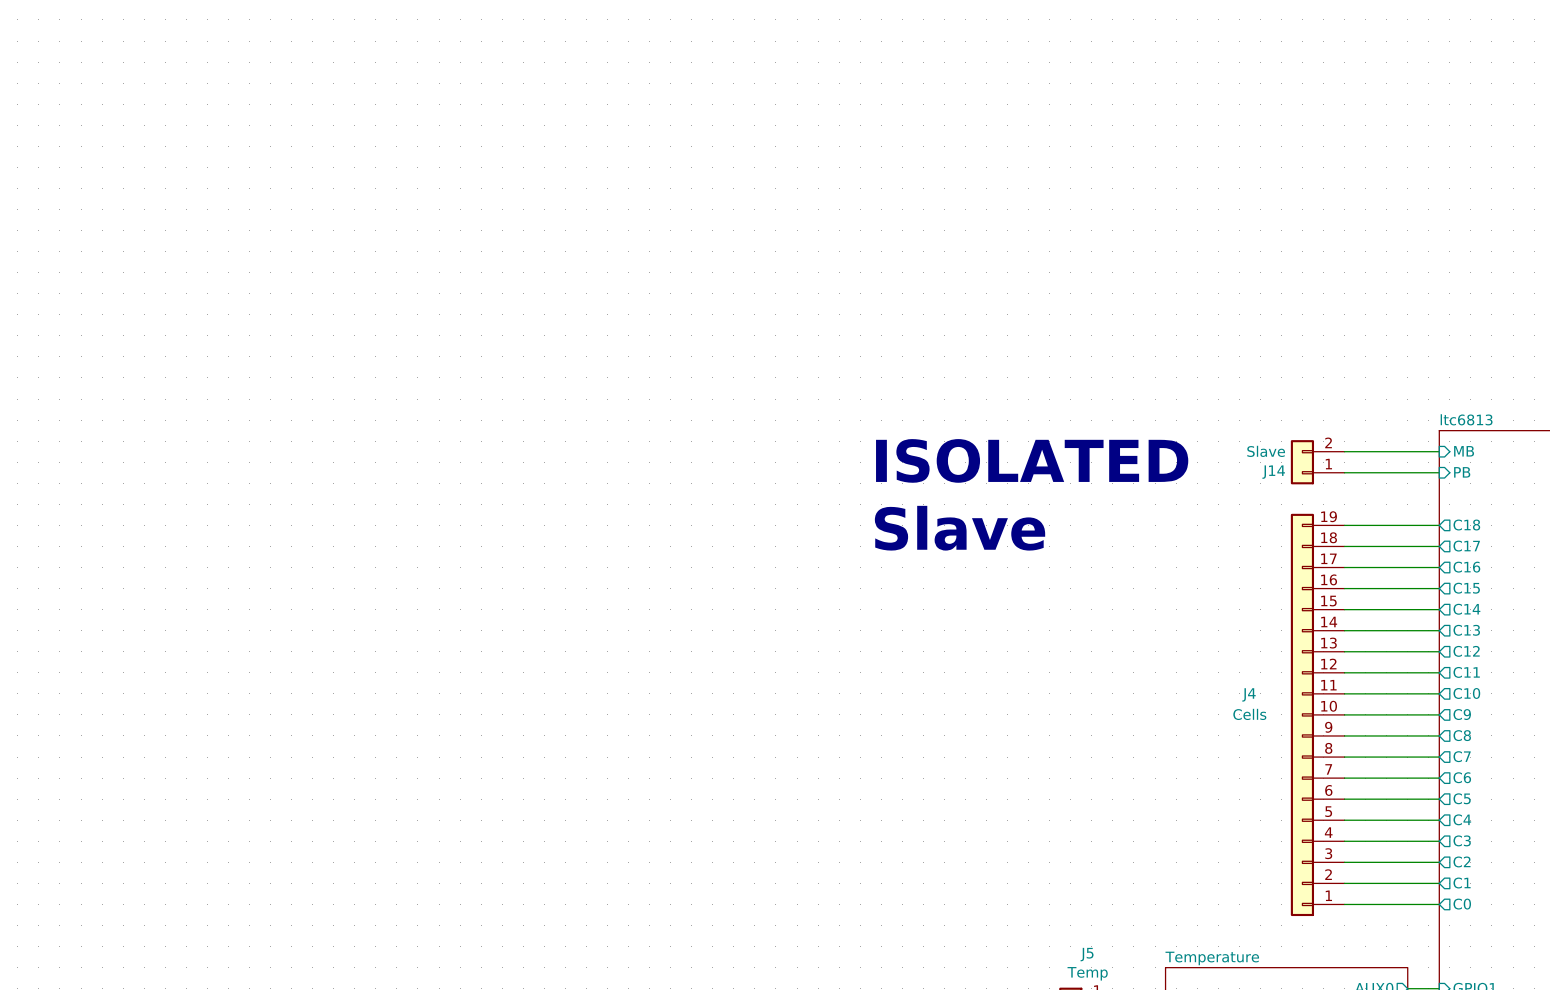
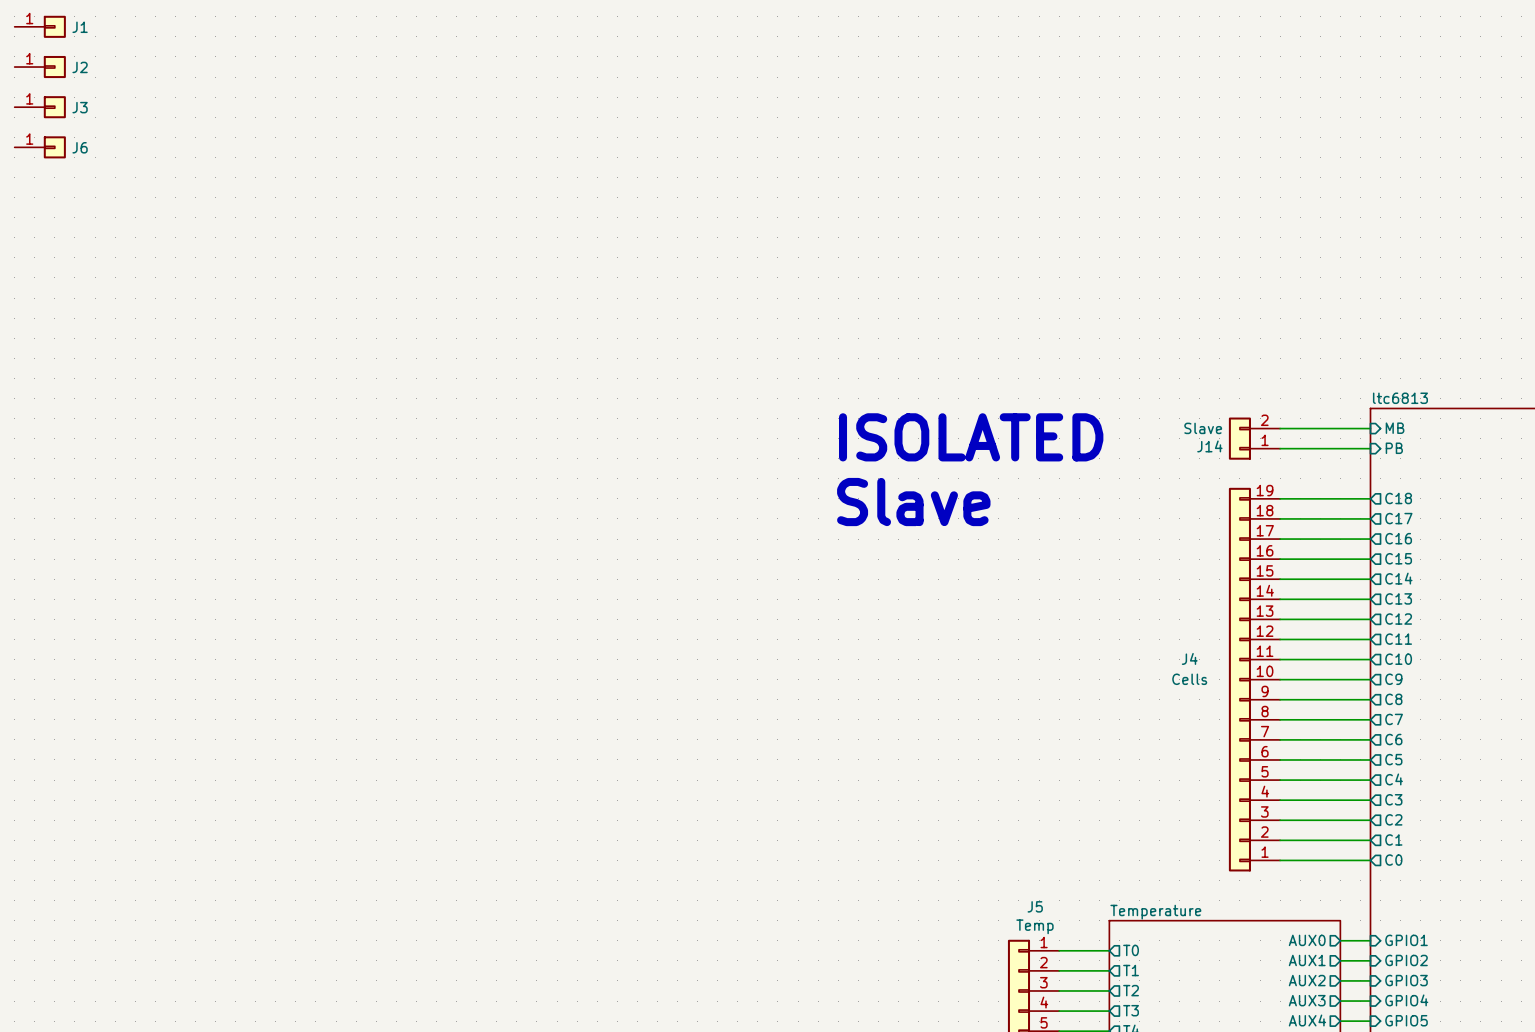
J1: none -> (40, 26)
J2: none -> (40, 67)
J3: none -> (40, 107)
J6: none -> (40, 147)

